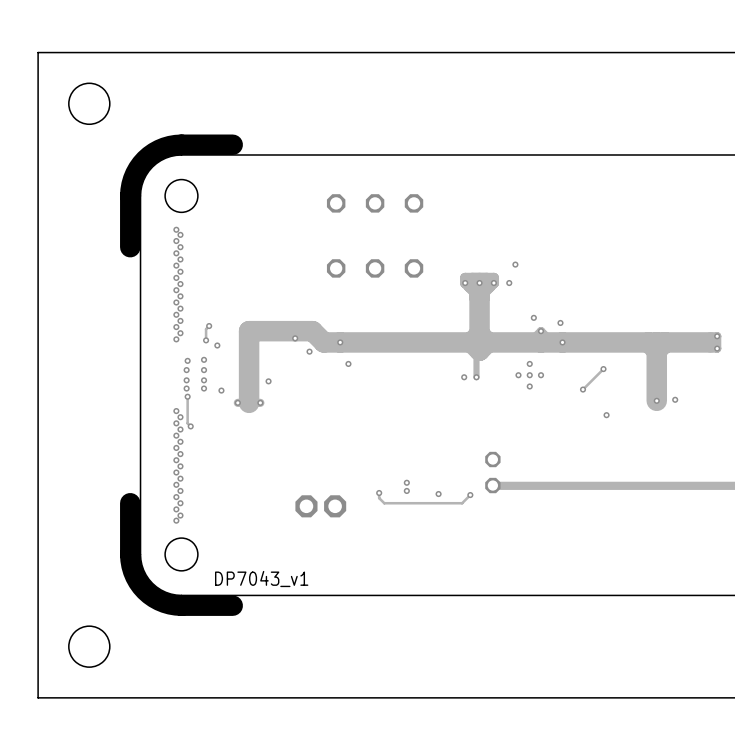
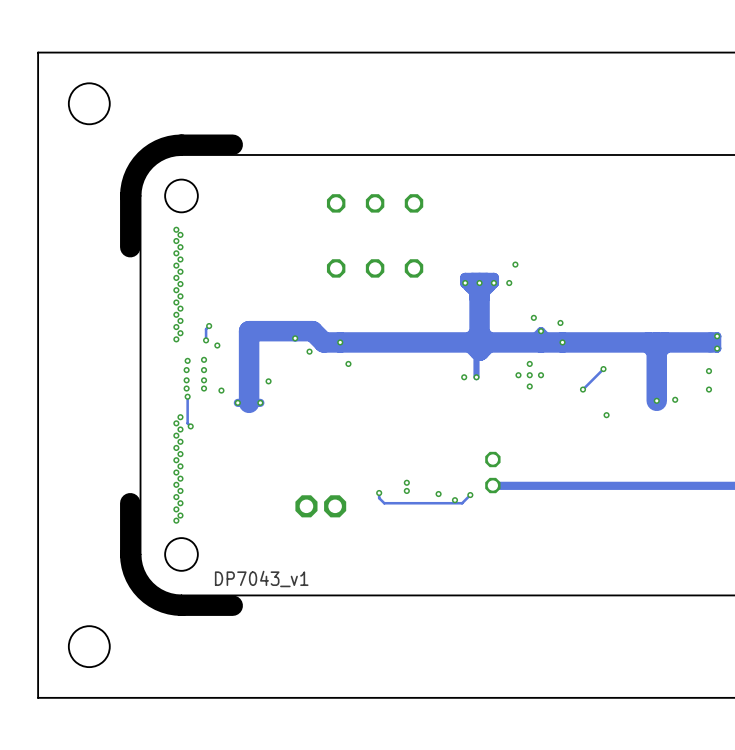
via: none -> (709, 371)
via: none -> (709, 389)
via: (176, 411) -> none
via: none -> (454, 500)

